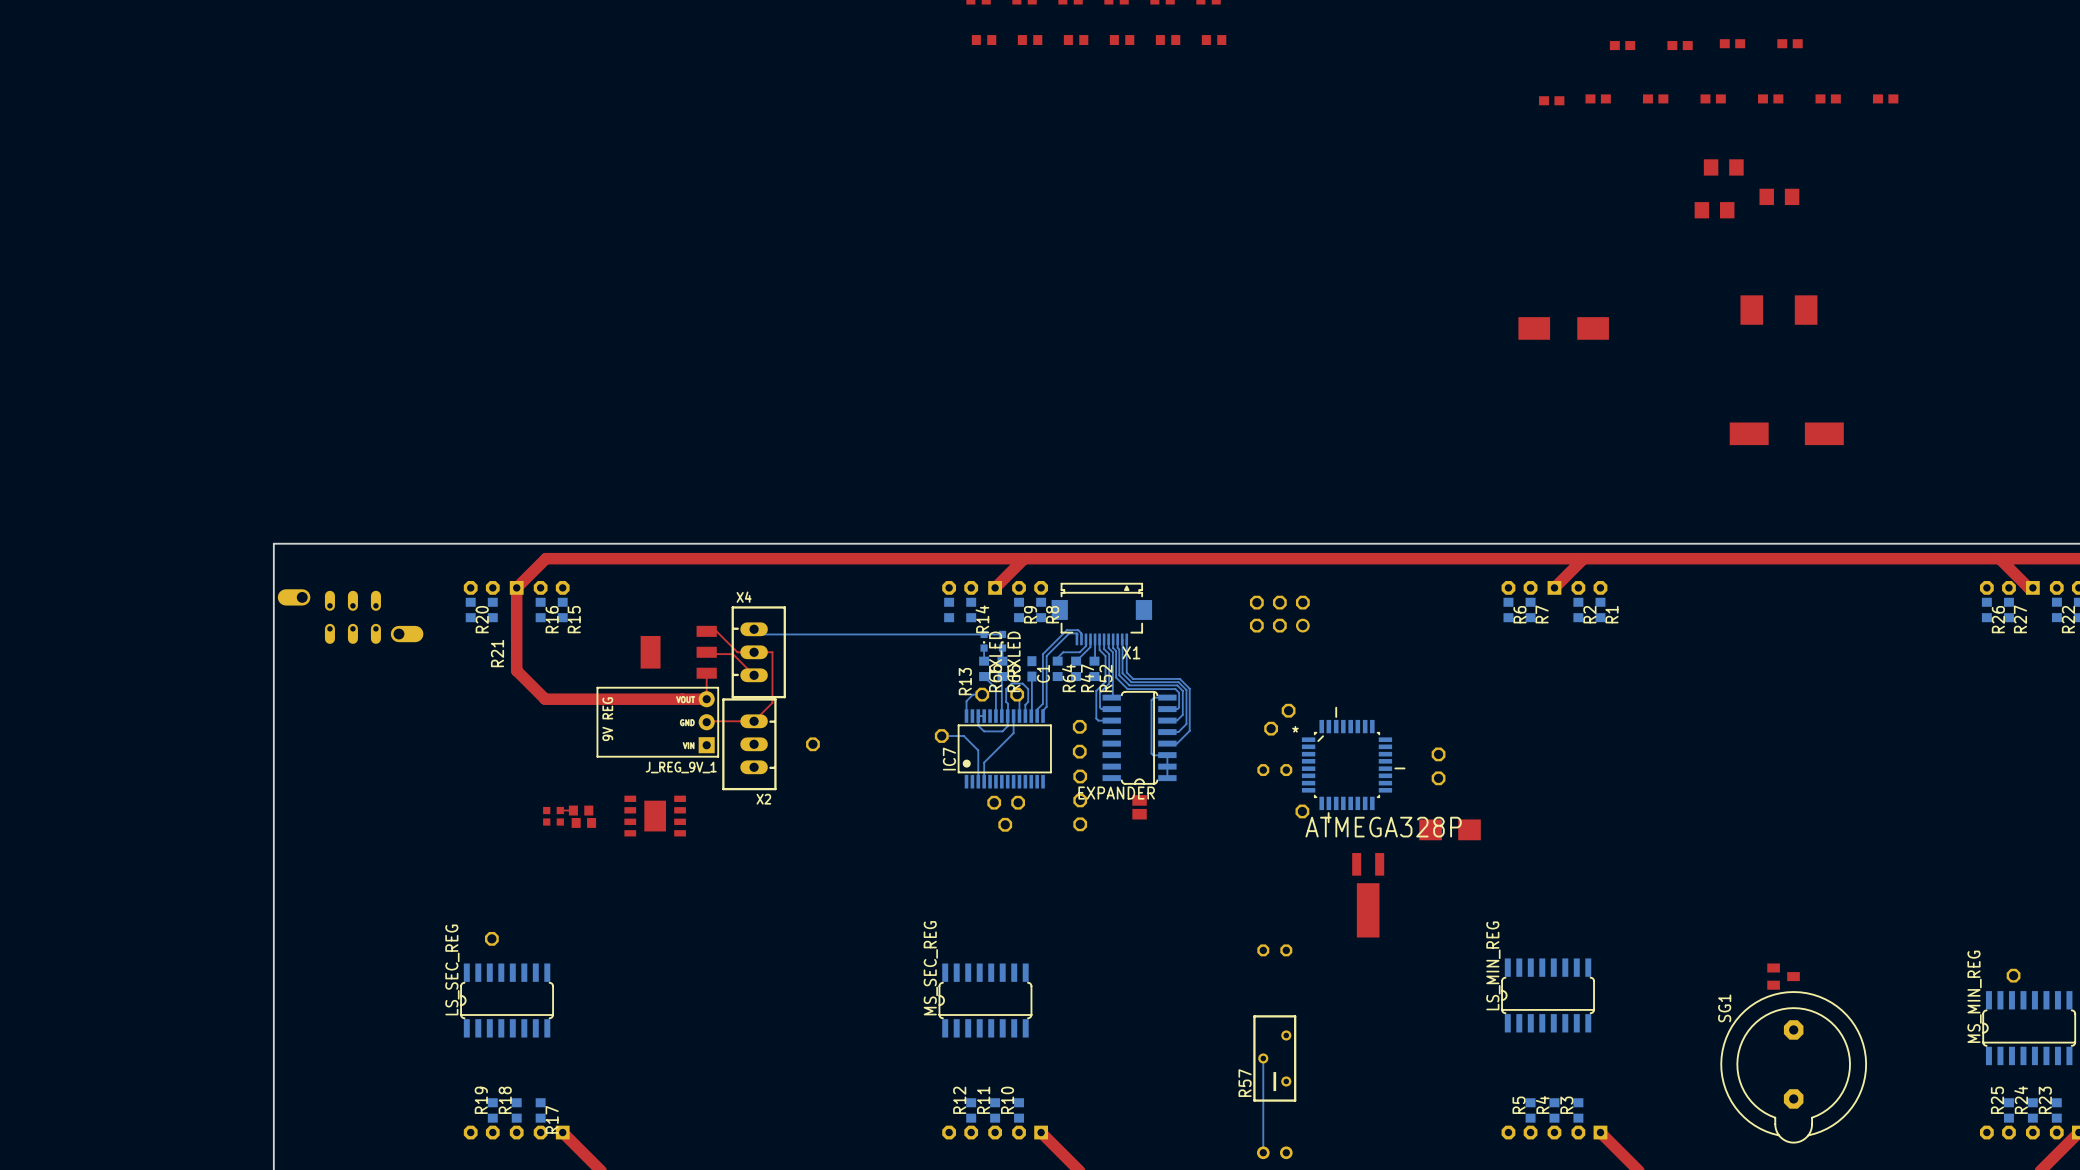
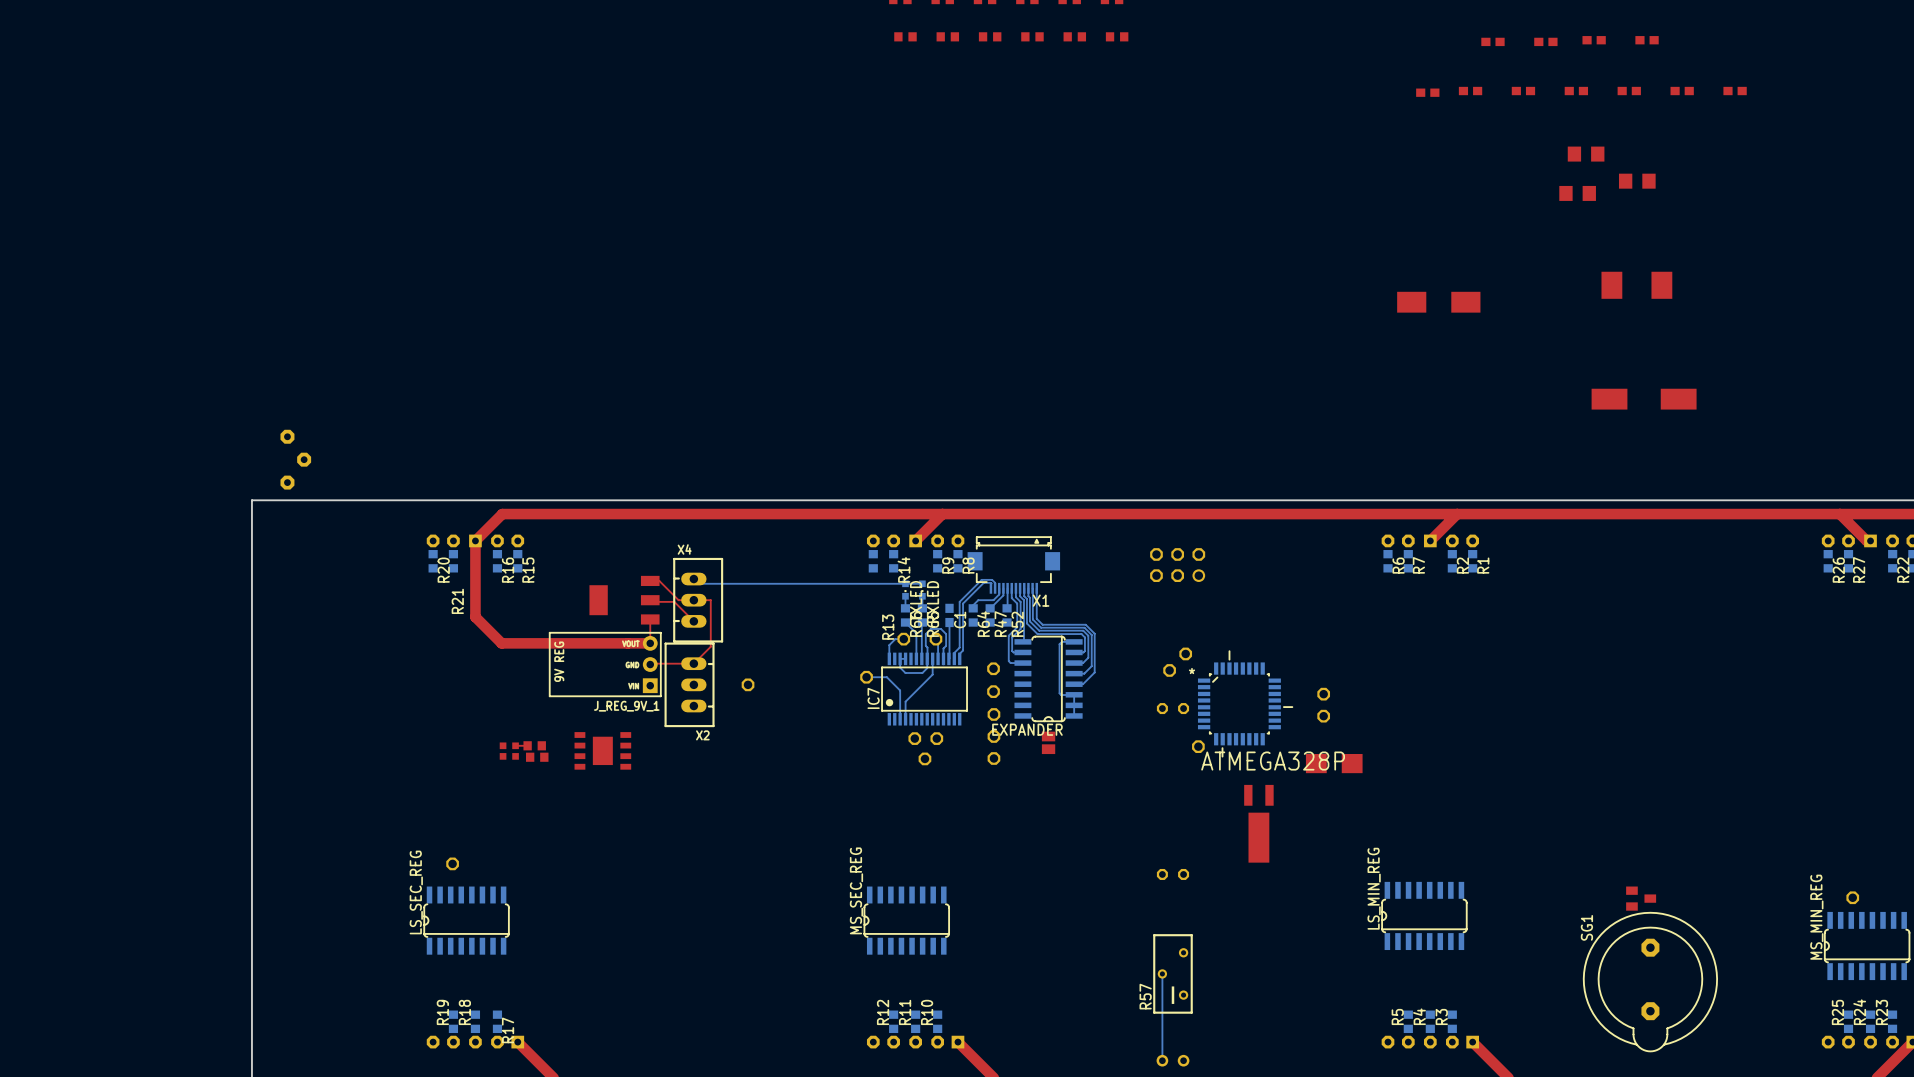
part: none -> (295, 459)
part: (350, 616) -> none

